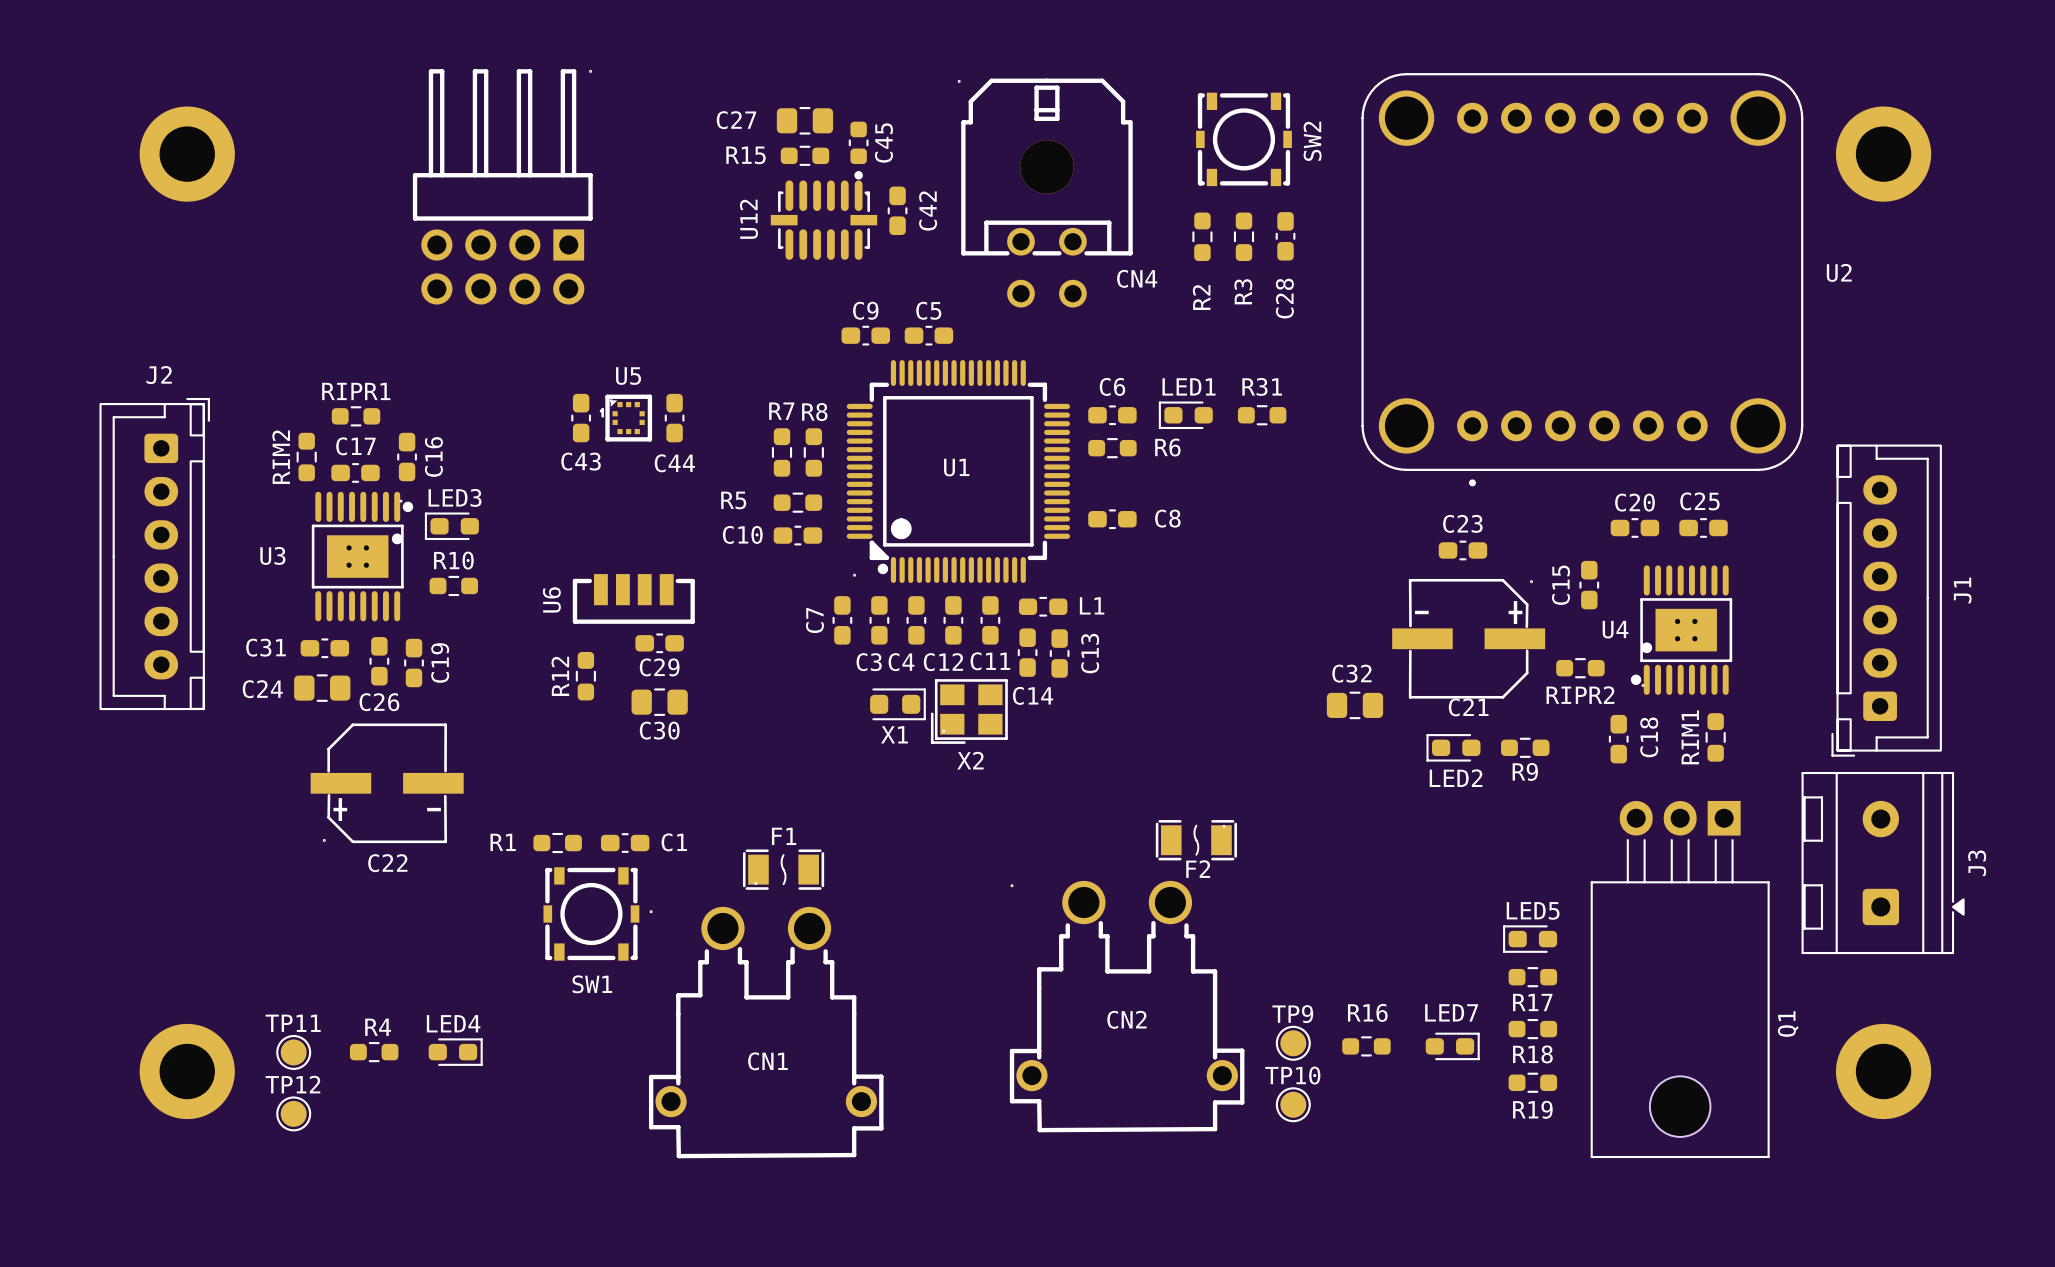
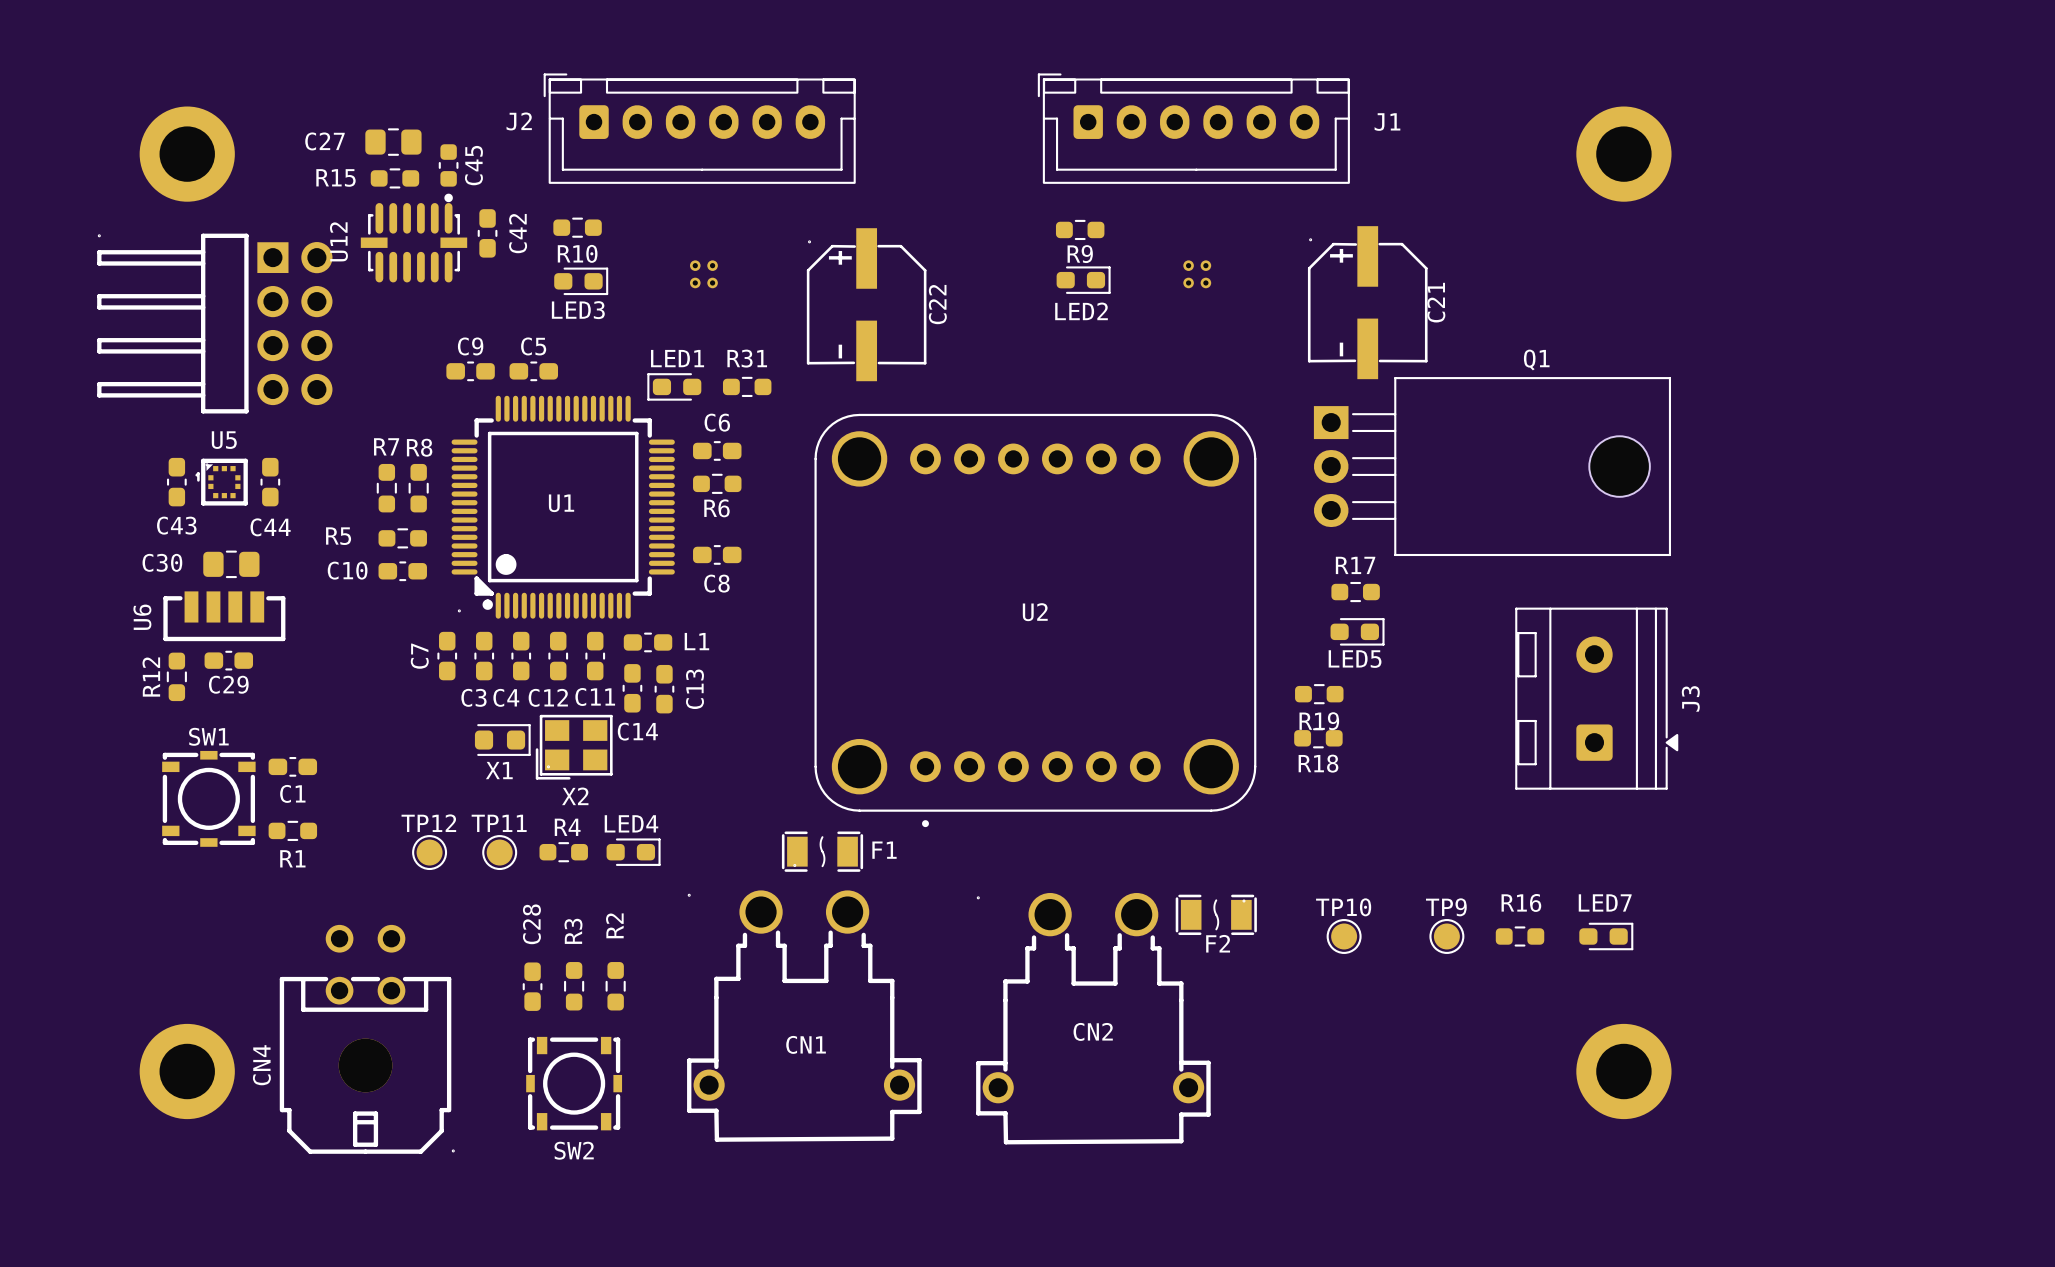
C27 position: (804, 120) -> (393, 142)
SW2 rotation: 0° (1243, 139) -> 180° (574, 1083)
SW2 position: (1243, 139) -> (574, 1083)
SW2 name position: SW2 (1312, 141) -> SW2 (574, 1150)
C45 position: (858, 142) -> (448, 165)
part position: (1883, 154) -> (1623, 154)
R15 position: (804, 155) -> (394, 178)
part rotation: 0° (502, 186) -> 90° counterclockwise (214, 323)
part position: (502, 186) -> (214, 323)
CN4 rotation: 0° (1045, 193) -> 180° (367, 1039)
CN4 position: (1045, 193) -> (367, 1039)
C42 position: (897, 210) -> (487, 233)
U12 position: (824, 215) -> (414, 238)
R2 position: (1202, 236) -> (615, 986)
R3 position: (1243, 236) -> (574, 986)
C28 position: (1285, 236) -> (532, 986)
U2 name position: U2 (1839, 272) -> U2 (1035, 612)
part: none -> (703, 274)
part: none -> (1197, 274)
CN4 name position: CN4 (1137, 278) -> CN4 (261, 1065)
U2 position: (1582, 279) -> (1035, 620)
R3 name position: R3 (1243, 291) -> R3 (573, 931)
R2 name position: R2 (1201, 297) -> R2 (614, 925)
C28 name position: C28 (1284, 298) -> C28 (531, 924)
C9 position: (865, 335) -> (470, 371)
C5 position: (928, 335) -> (533, 371)
C6 position: (1112, 415) -> (717, 450)
LED1 position: (1185, 415) -> (674, 386)
R31 position: (1262, 415) -> (747, 386)
RIPR1: (356, 416) -> none
C43 position: (581, 418) -> (176, 482)
U5 position: (625, 418) -> (221, 482)
C44 position: (674, 418) -> (270, 482)
R6 name position: R6 (1167, 447) -> R6 (716, 508)
R6 position: (1112, 448) -> (717, 483)
R7 position: (781, 452) -> (386, 488)
R8 position: (813, 452) -> (418, 488)
RIM2: (306, 457) -> none
C16: (407, 457) -> none
U1 position: (958, 471) -> (563, 507)
C17: (355, 472) -> none
R5 position: (797, 502) -> (402, 538)
C8 name position: C8 (1167, 518) -> C8 (716, 583)
C8 position: (1112, 519) -> (717, 554)
LED3 rotation: 0° (451, 526) -> 180° (581, 281)
LED3 position: (451, 526) -> (581, 281)
C20: (1634, 527) -> none
C25: (1703, 527) -> none
C10 position: (797, 535) -> (402, 571)
C23: (1462, 550) -> none
J2 rotation: 0° (154, 554) -> 90° counterclockwise (699, 128)
J2 position: (154, 554) -> (699, 128)
U3: (362, 556) -> none
R10 name position: R10 (453, 560) -> R10 (577, 253)
R10 position: (453, 585) -> (577, 227)
C15: (1589, 585) -> none
J1 name position: J1 (1962, 590) -> J1 (1387, 122)
U6 position: (633, 598) -> (224, 616)
J1 rotation: 0° (1886, 600) -> 90° clockwise (1193, 128)
J1 position: (1886, 600) -> (1193, 128)
L1 position: (1043, 606) -> (648, 642)
C7 position: (842, 620) -> (447, 656)
C3 position: (879, 620) -> (484, 656)
C4 position: (916, 620) -> (521, 656)
C12 position: (953, 620) -> (558, 656)
C11 position: (990, 620) -> (595, 656)
U4: (1681, 630) -> none
C21 rotation: 0° (1468, 638) -> 90° counterclockwise (1367, 302)
C21 position: (1468, 638) -> (1367, 302)
C29 position: (659, 643) -> (228, 660)
C24: (324, 648) -> none
C14 position: (1027, 652) -> (632, 688)
C13 position: (1059, 653) -> (664, 689)
C26: (379, 661) -> none
C19: (414, 663) -> none
RIPR2: (1580, 668) -> none
R12 position: (585, 676) -> (176, 676)
C31: (322, 688) -> none
C30 position: (659, 702) -> (231, 564)
X1 position: (897, 704) -> (502, 740)
C32: (1354, 705) -> none
X2 position: (969, 711) -> (574, 747)
C30 name position: C30 (659, 730) -> C30 (162, 562)
RIM1: (1715, 737) -> none
C18: (1618, 739) -> none
LED2 rotation: 0° (1453, 747) -> 180° (1083, 280)
LED2 position: (1453, 747) -> (1083, 280)
R9 position: (1525, 747) -> (1080, 229)
C22 rotation: 0° (387, 783) -> 90° clockwise (866, 304)
C22 position: (387, 783) -> (866, 304)
F1 name position: F1 (784, 836) -> F1 (884, 850)
F2 position: (1196, 840) -> (1216, 914)
R1 name position: R1 (503, 842) -> R1 (292, 858)
C1 name position: C1 (674, 842) -> C1 (292, 793)
R1 position: (557, 843) -> (292, 830)
C1 position: (625, 843) -> (292, 766)
C22 name position: C22 (387, 863) -> C22 (937, 304)
J3 position: (1883, 863) -> (1596, 698)
F1 position: (783, 869) -> (822, 851)
SW1 rotation: 0° (591, 913) -> 90° clockwise (208, 798)
SW1 position: (591, 913) -> (208, 798)
LED5 rotation: 0° (1530, 939) -> 180° (1357, 631)
LED5 position: (1530, 939) -> (1357, 631)
R17 position: (1532, 977) -> (1355, 592)
Q1 rotation: 0° (1680, 979) -> 90° counterclockwise (1492, 466)
Q1 position: (1680, 979) -> (1492, 466)
SW1 name position: SW1 (592, 984) -> SW1 (208, 736)
R17 name position: R17 (1532, 1002) -> R17 (1355, 565)
CN2 position: (1127, 1006) -> (1093, 1018)
R18 position: (1532, 1029) -> (1318, 738)
CN1 position: (766, 1032) -> (804, 1016)
TP9 position: (1293, 1043) -> (1446, 936)
R16 position: (1366, 1046) -> (1520, 936)
LED7 position: (1452, 1046) -> (1606, 936)
TP11 position: (293, 1052) -> (499, 852)
R4 position: (374, 1052) -> (563, 852)
LED4 position: (455, 1052) -> (633, 852)
part position: (1883, 1071) -> (1623, 1071)
R19 position: (1532, 1082) -> (1319, 694)
TP10 position: (1293, 1104) -> (1344, 936)
TP12 position: (293, 1113) -> (429, 852)

